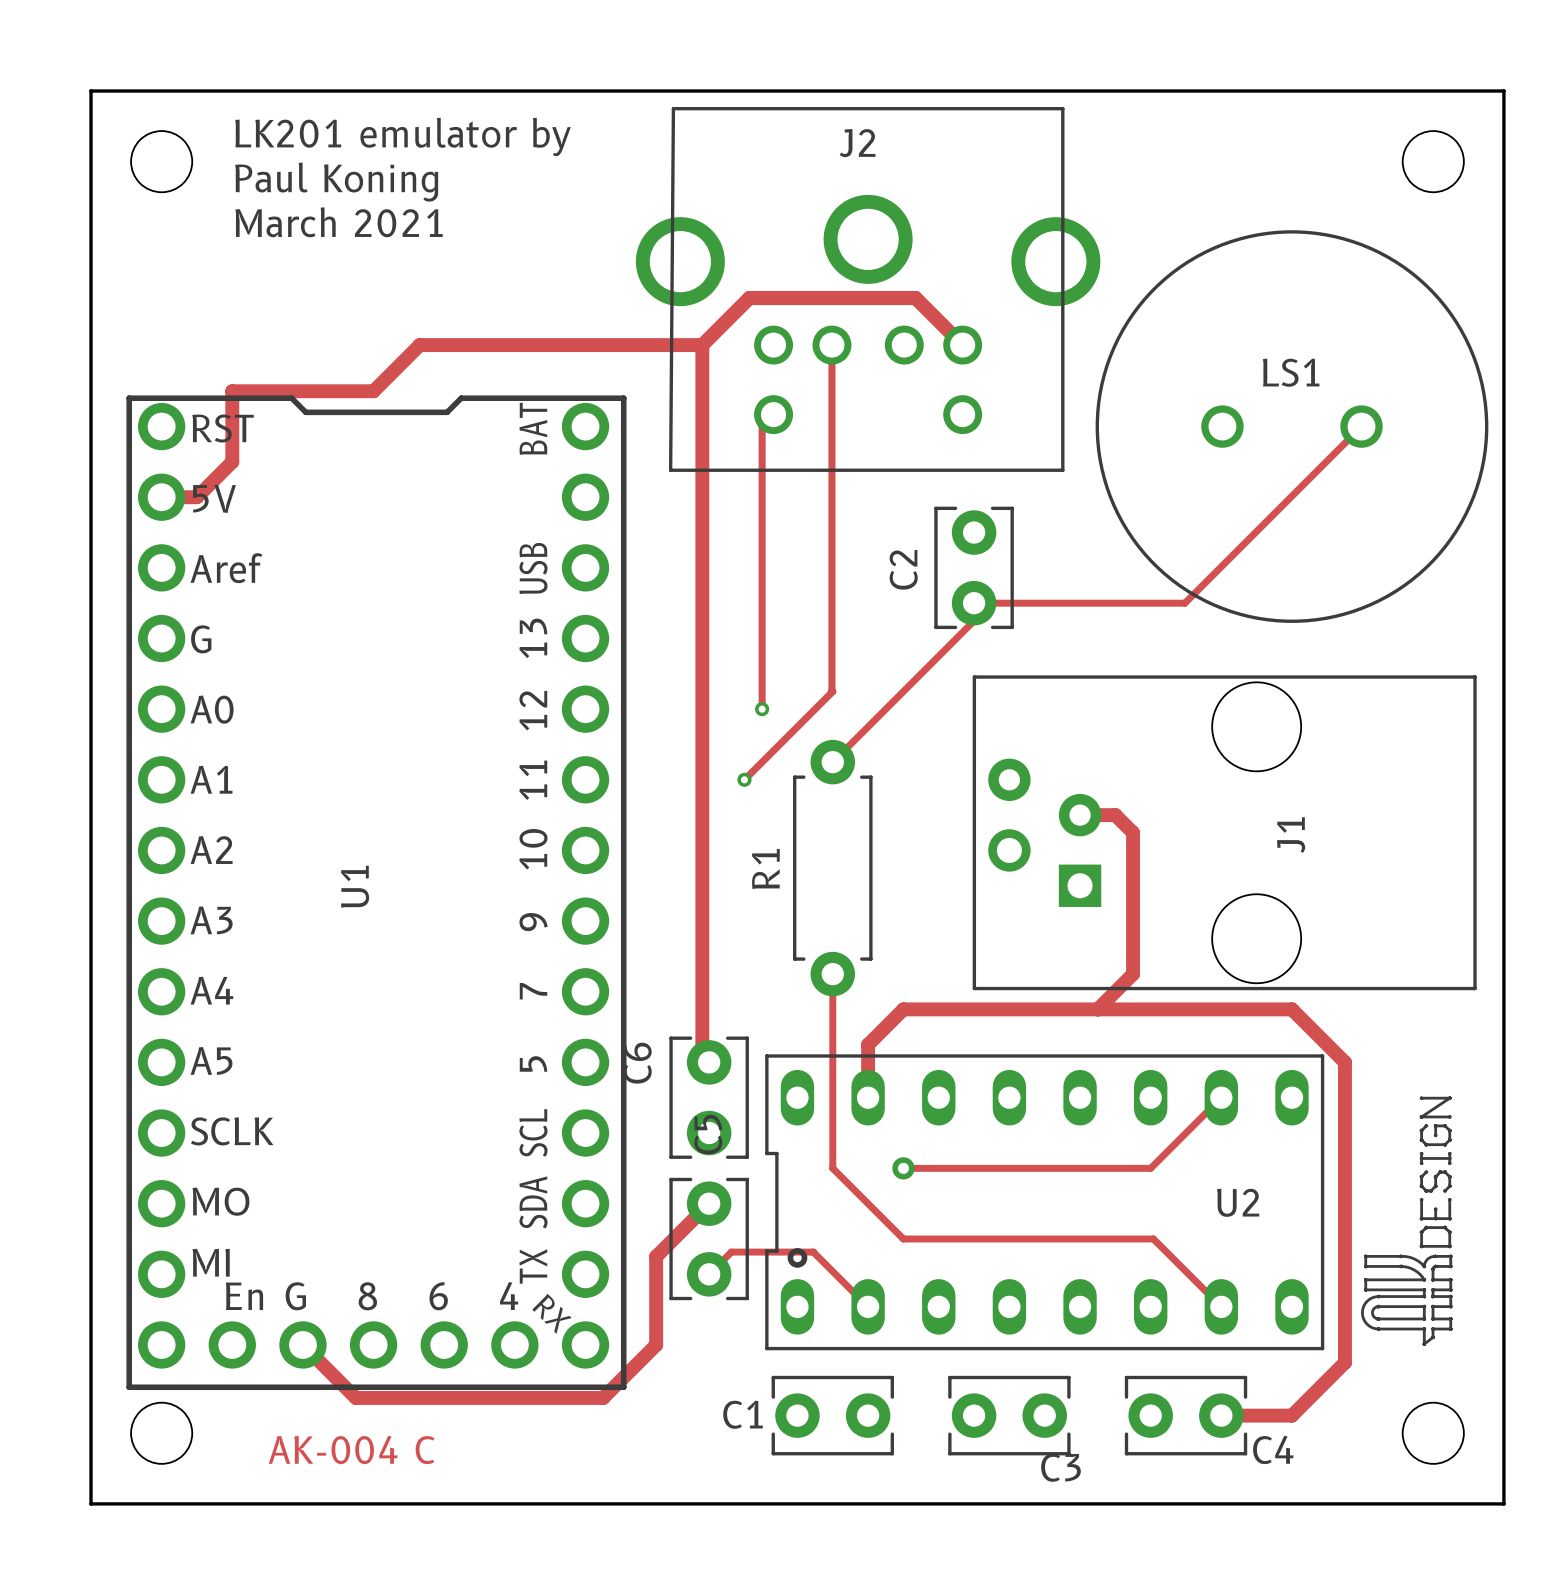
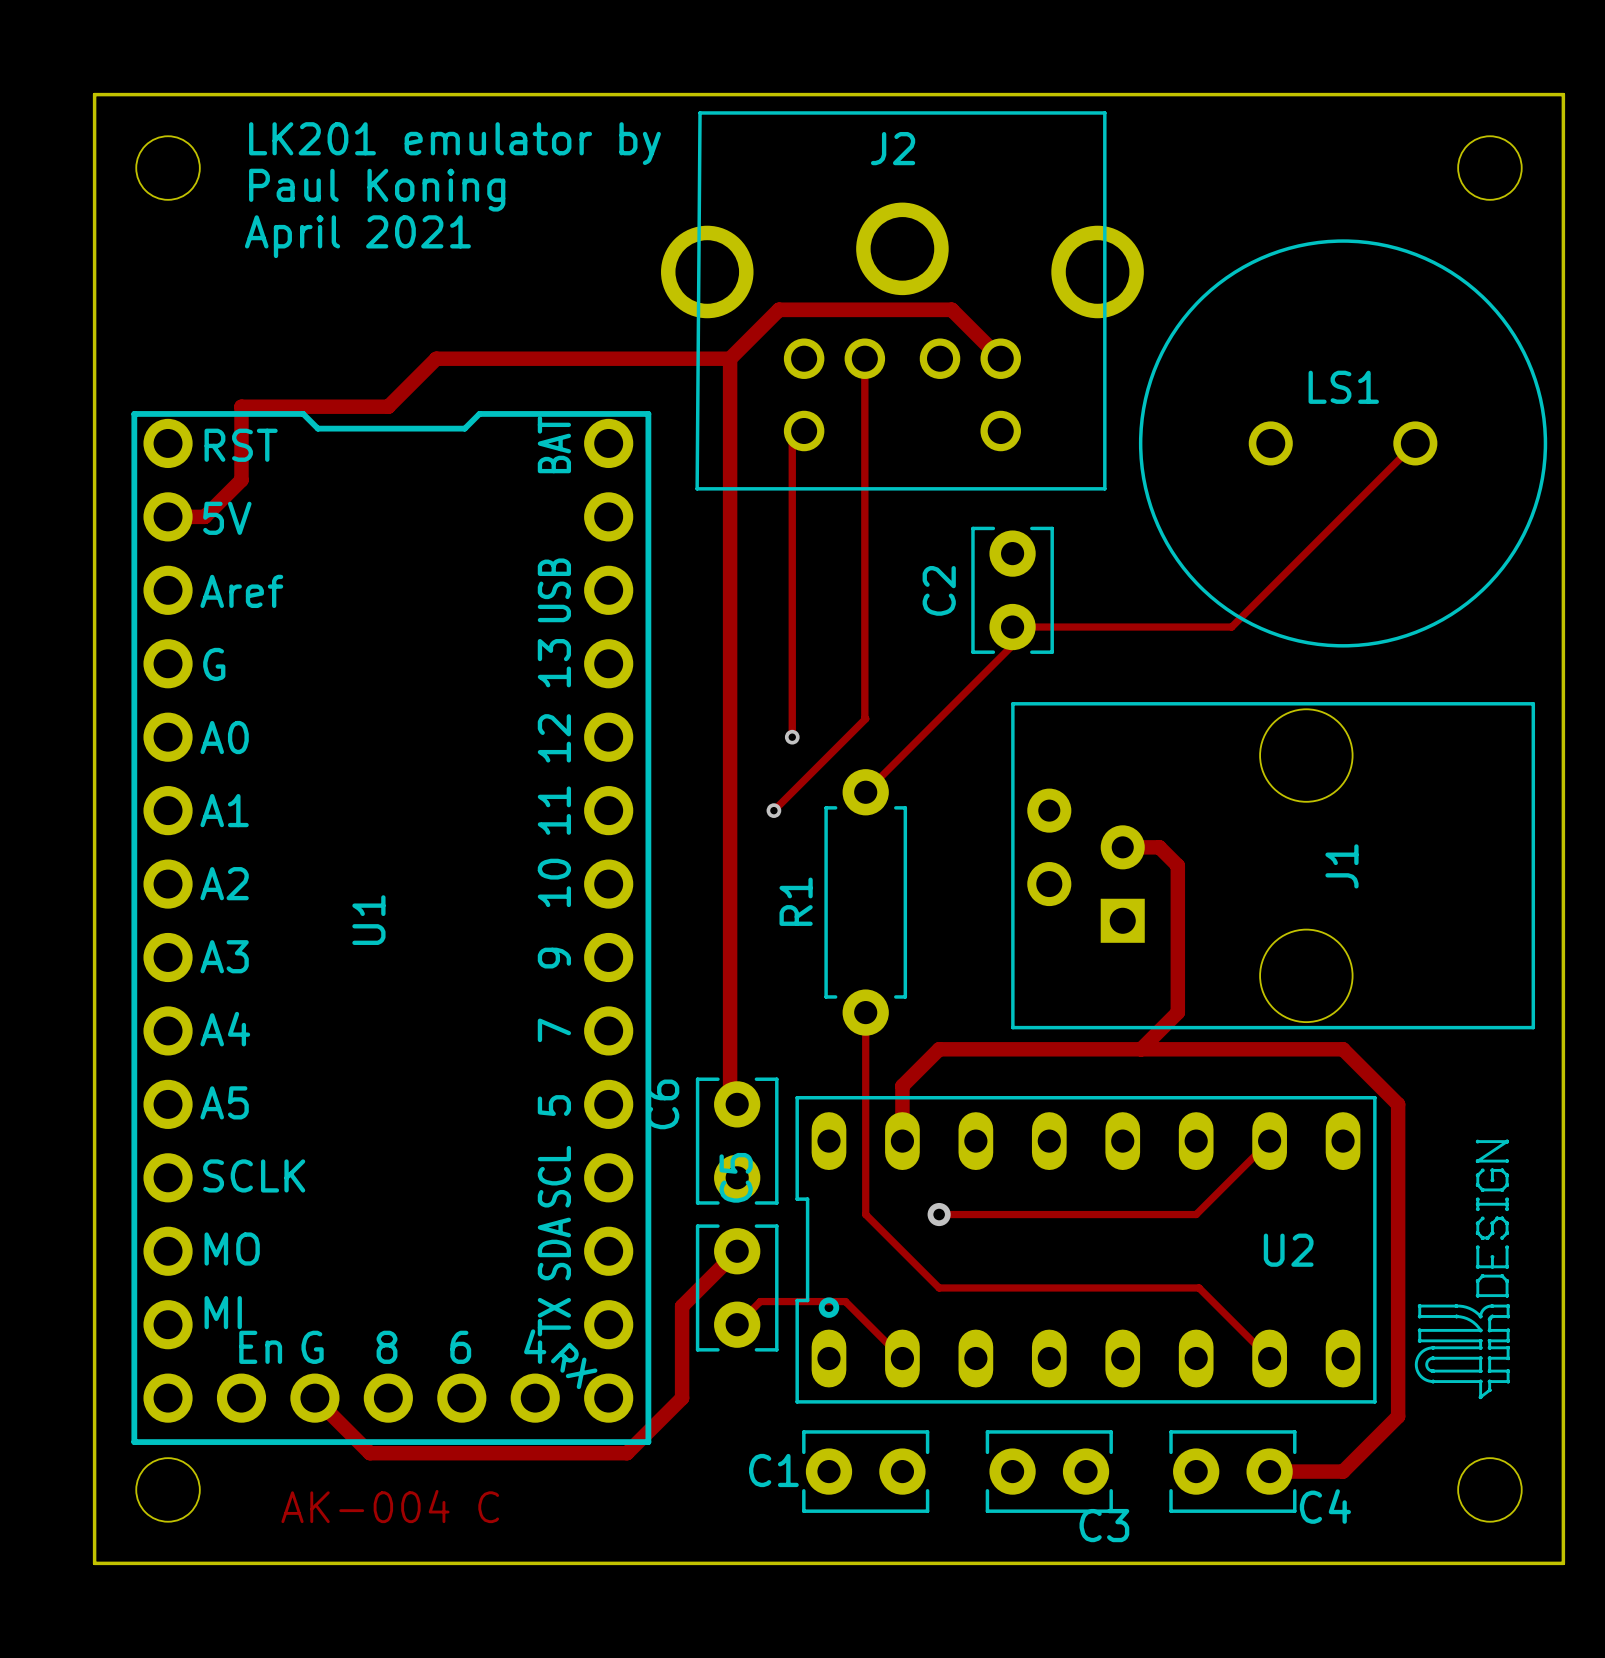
text: March 2021 (339, 222) -> April 2021 (357, 236)

